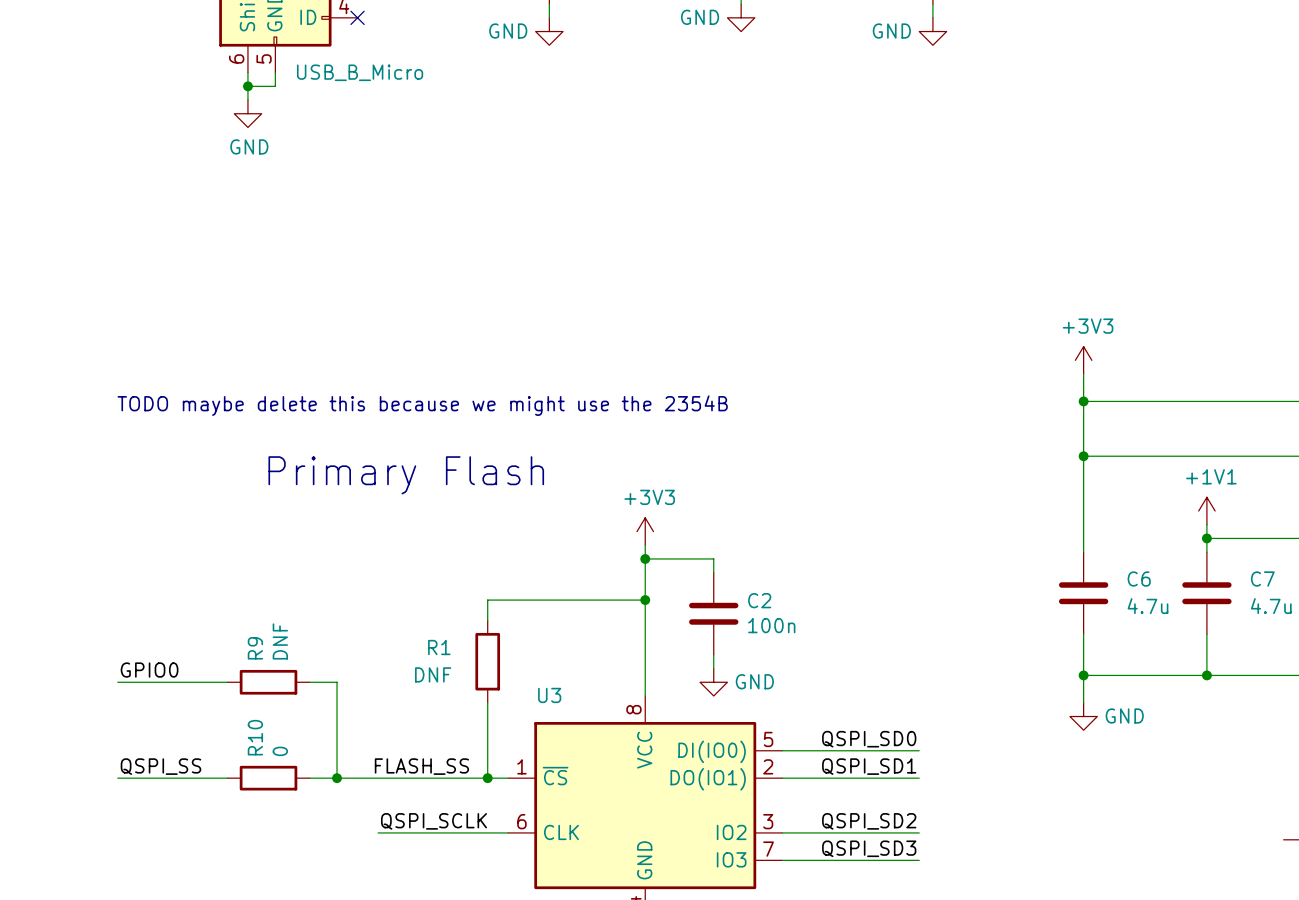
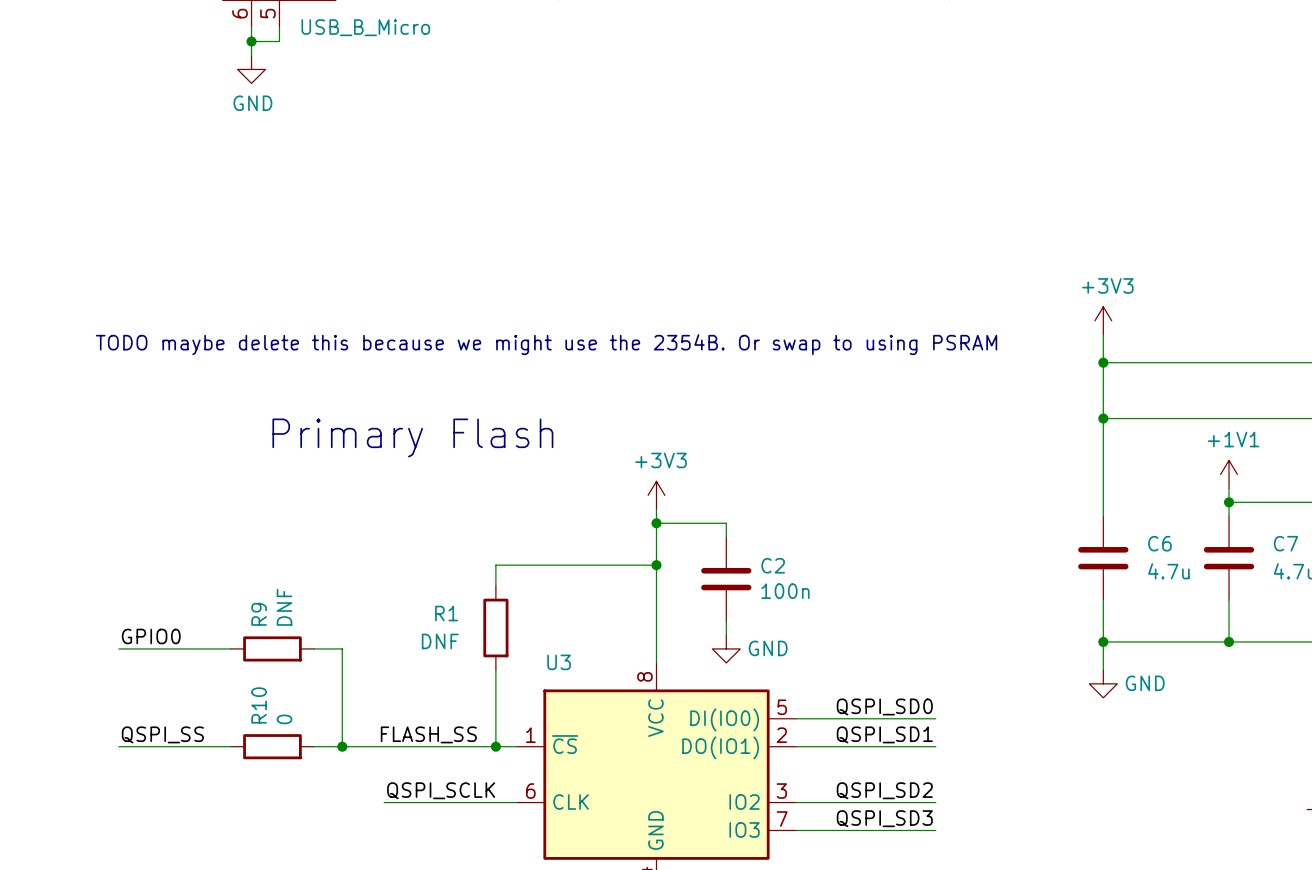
text: TODO maybe delete this because we might use the 2354B (422, 405) -> TODO maybe delete this because we might use the 2354B. Or swap to using PSRAM (546, 344)

